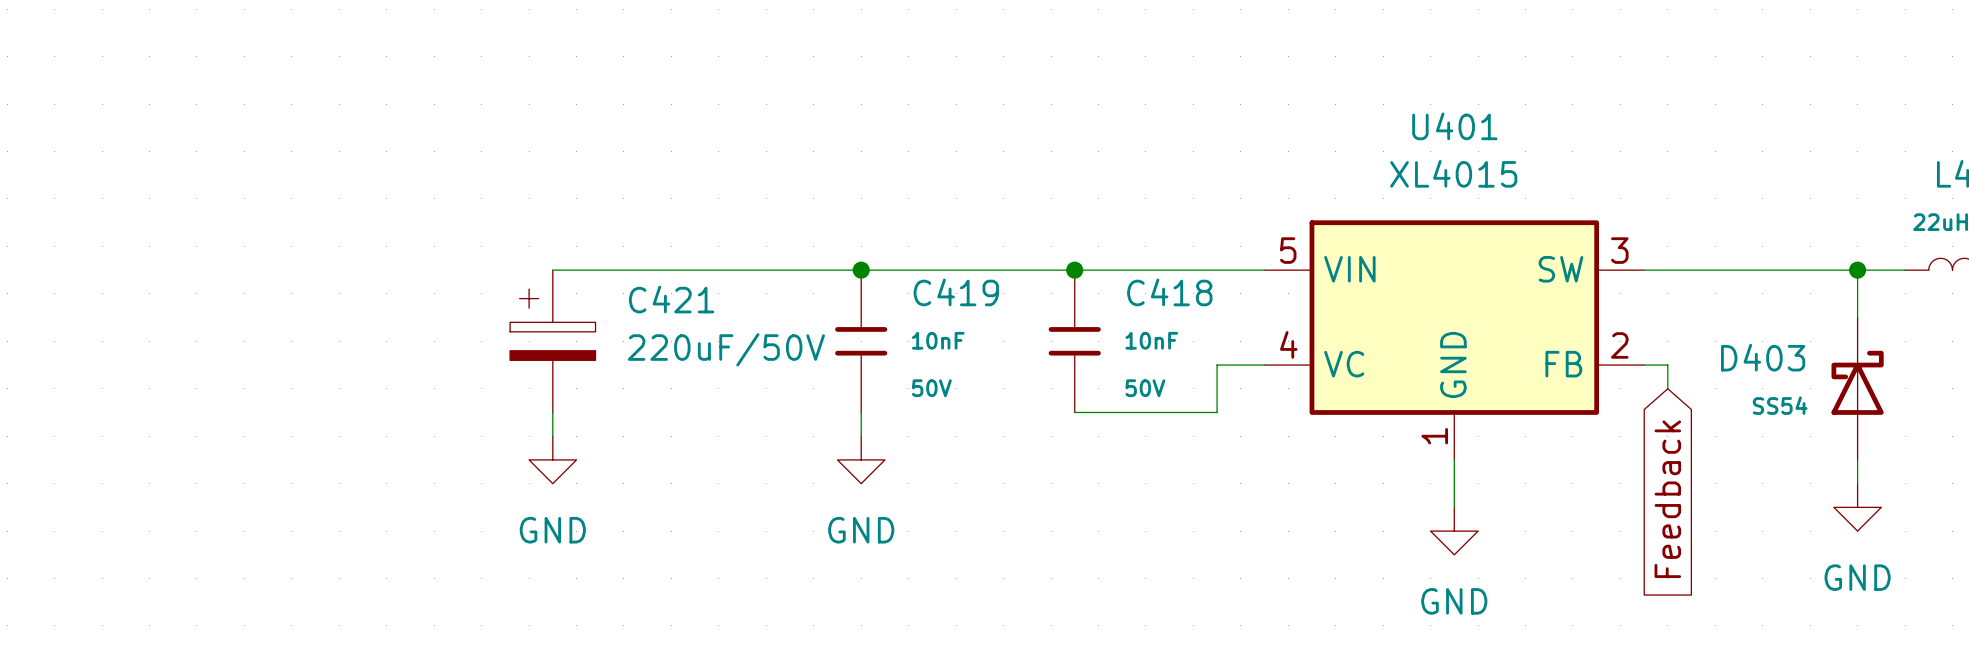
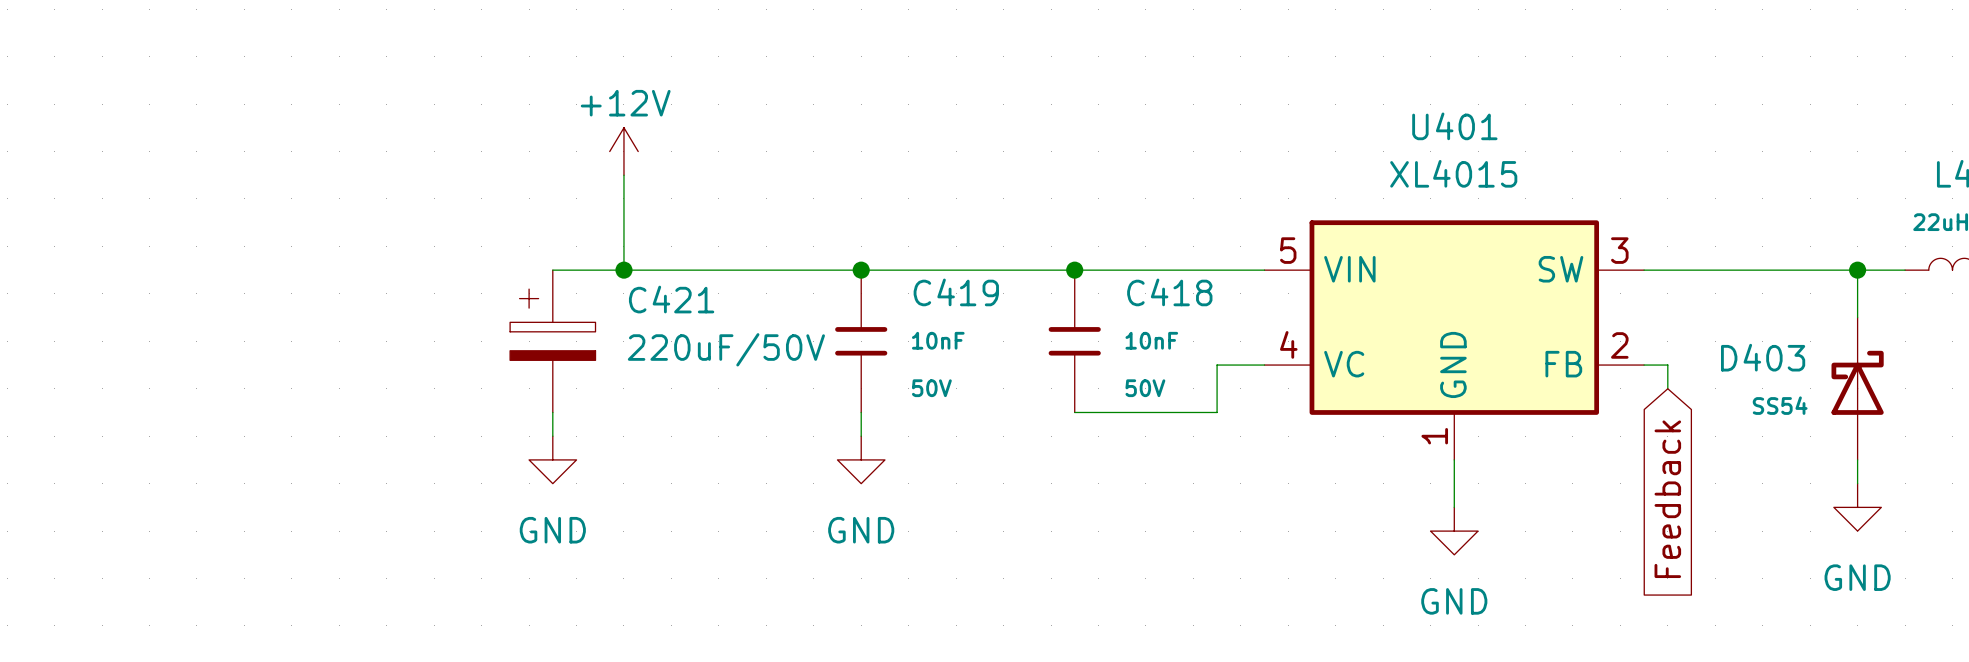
power symbol: none -> +12V (623, 151)
wire: none -> (623, 175) (623, 270)
junction: none -> (623, 270)

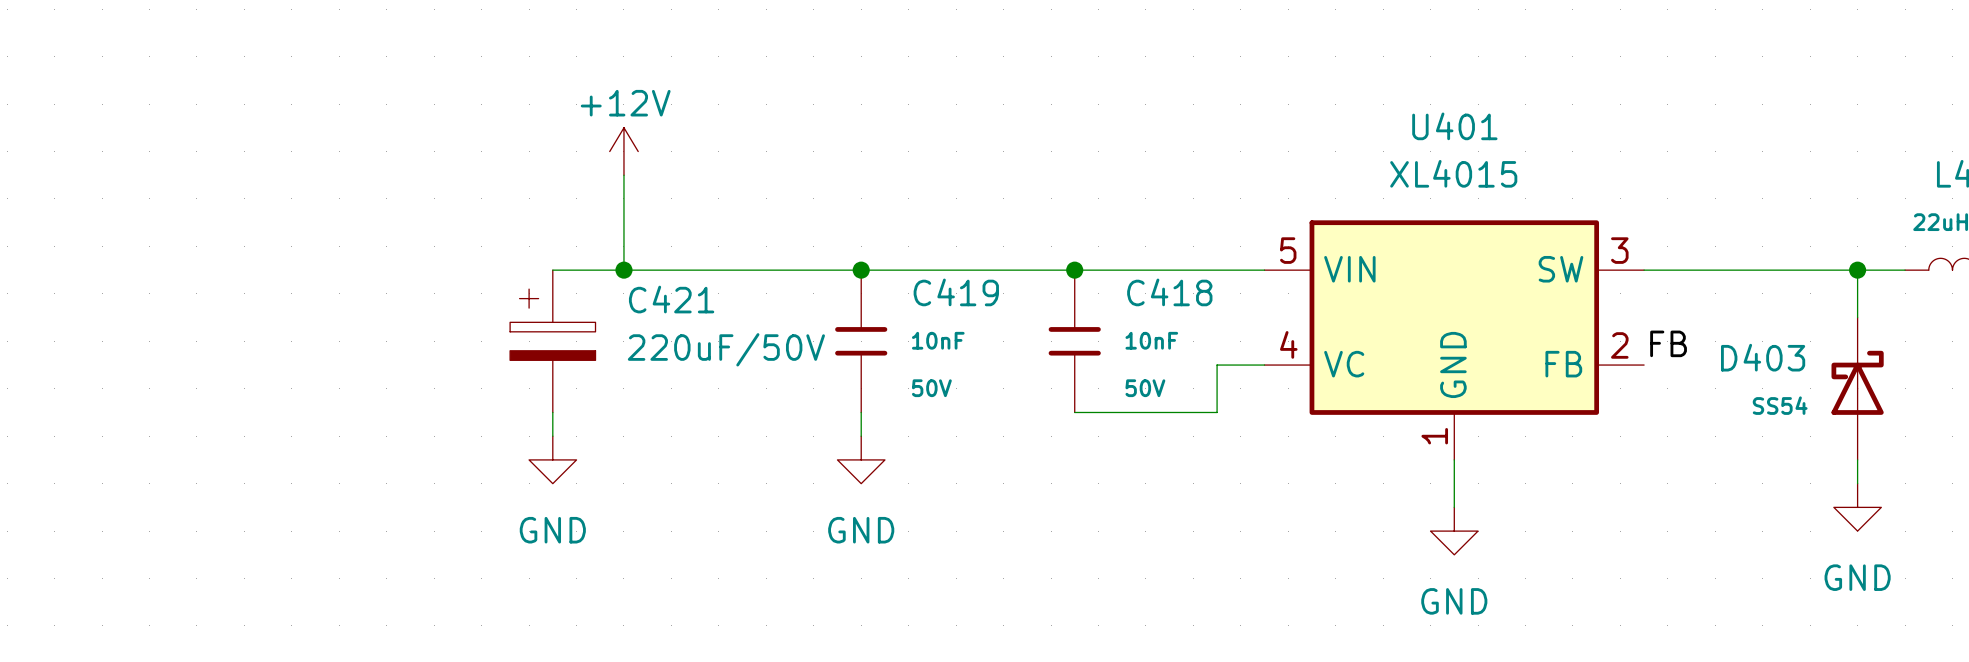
label: none -> FB (1668, 343)
wire: (1644, 365) (1667, 365) (1667, 388) -> none
global label: Feedback (1667, 499) -> none

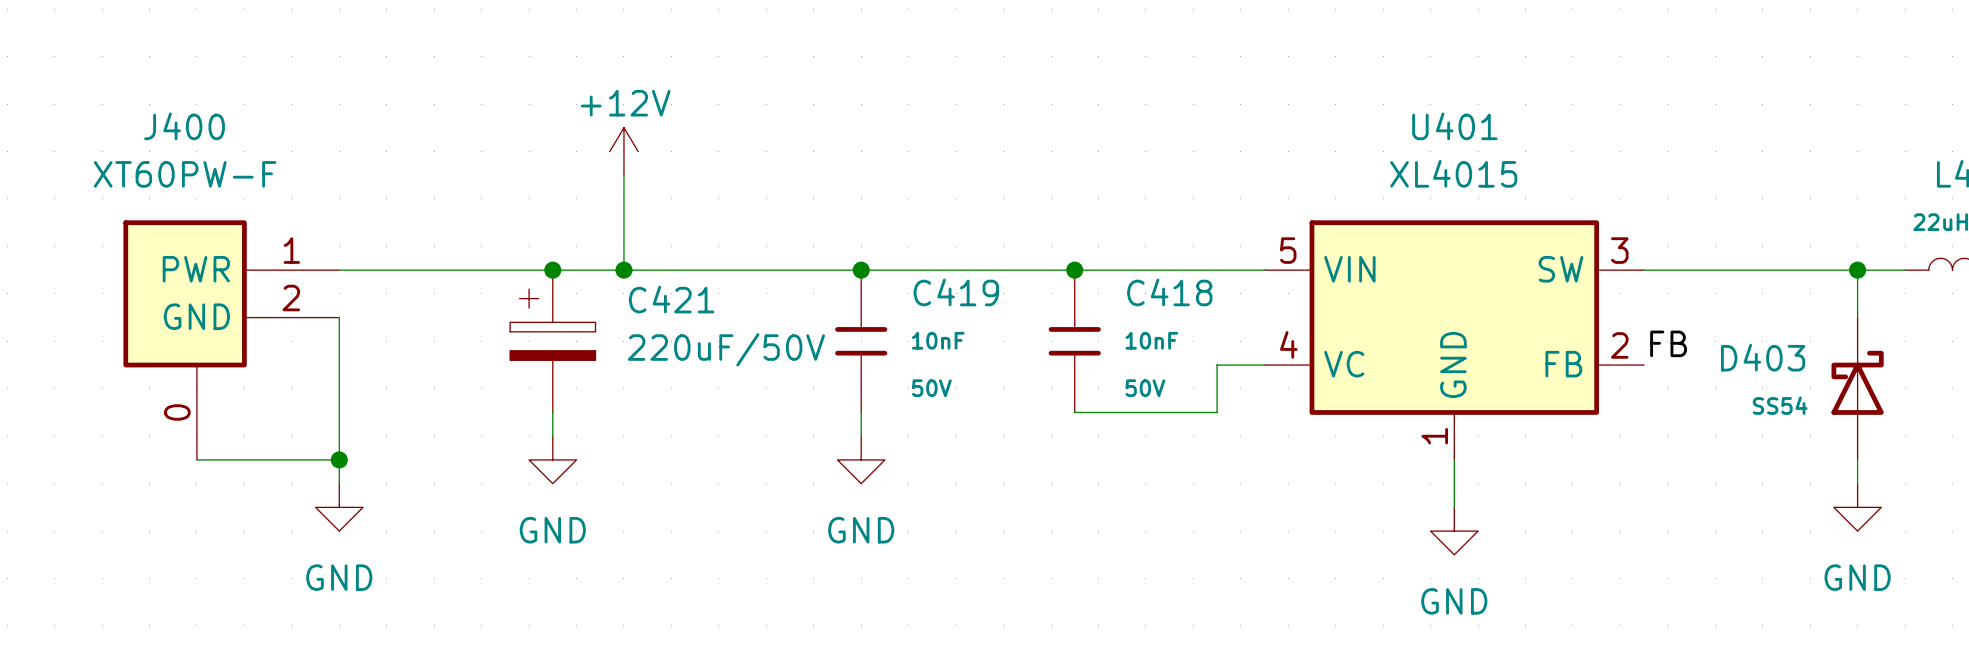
wire: none -> (339, 270) (552, 270)
junction: none -> (552, 270)
wire: none -> (339, 317) (339, 483)
J400: none -> XT60PW-F (231, 340)
wire: none -> (196, 459) (339, 459)
junction: none -> (339, 459)
power symbol: none -> GND (339, 507)

